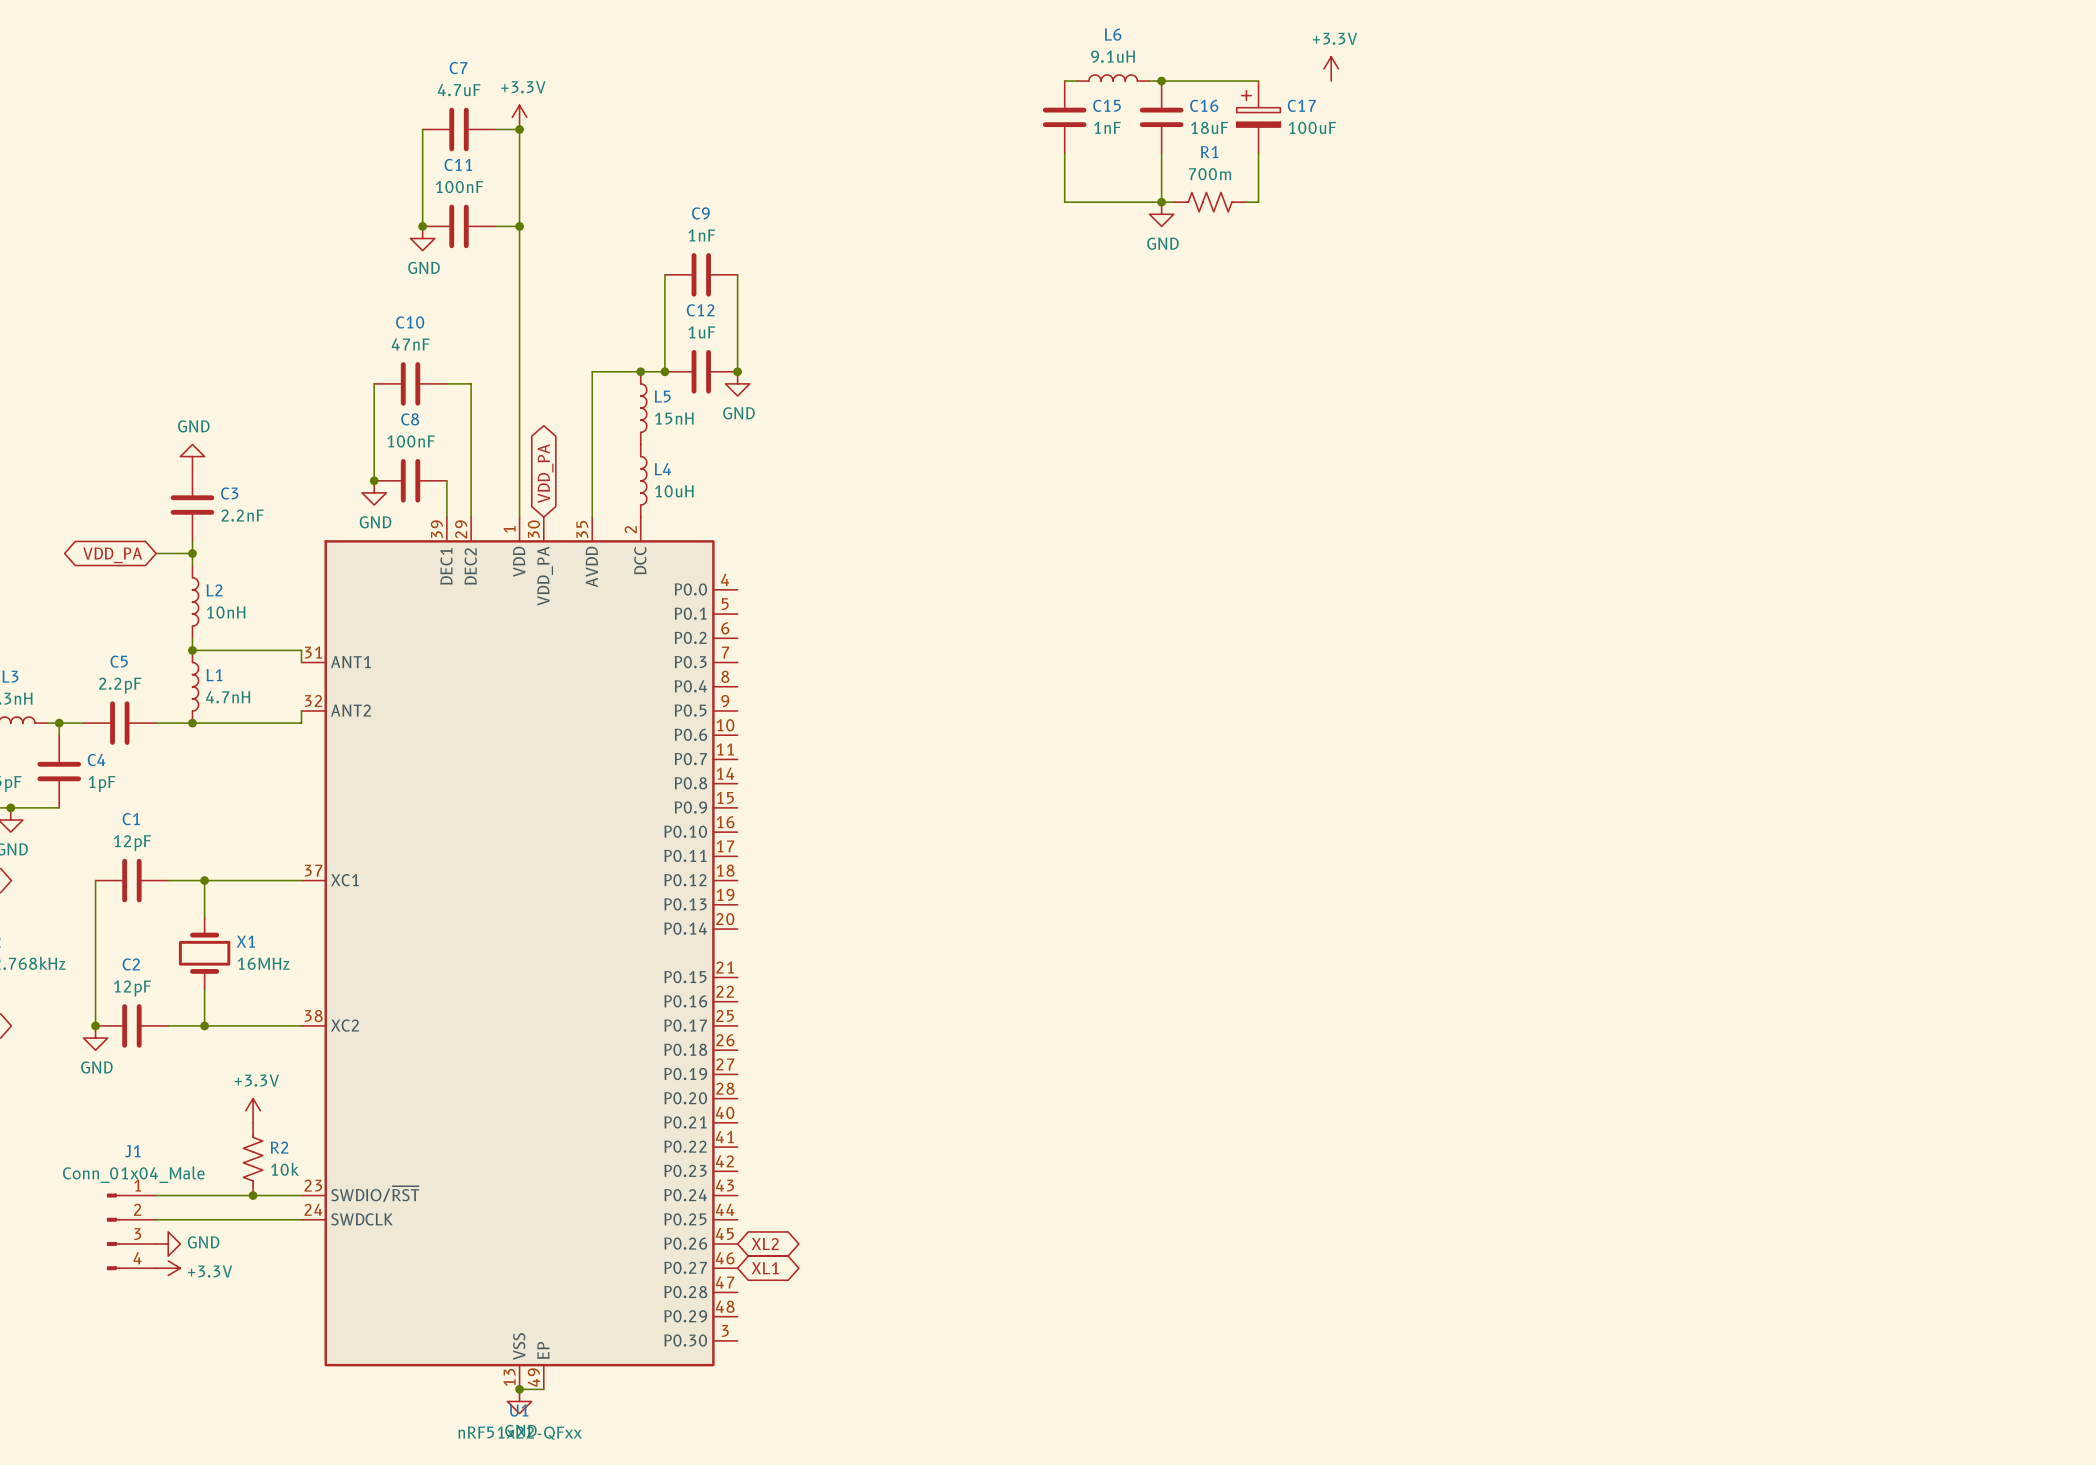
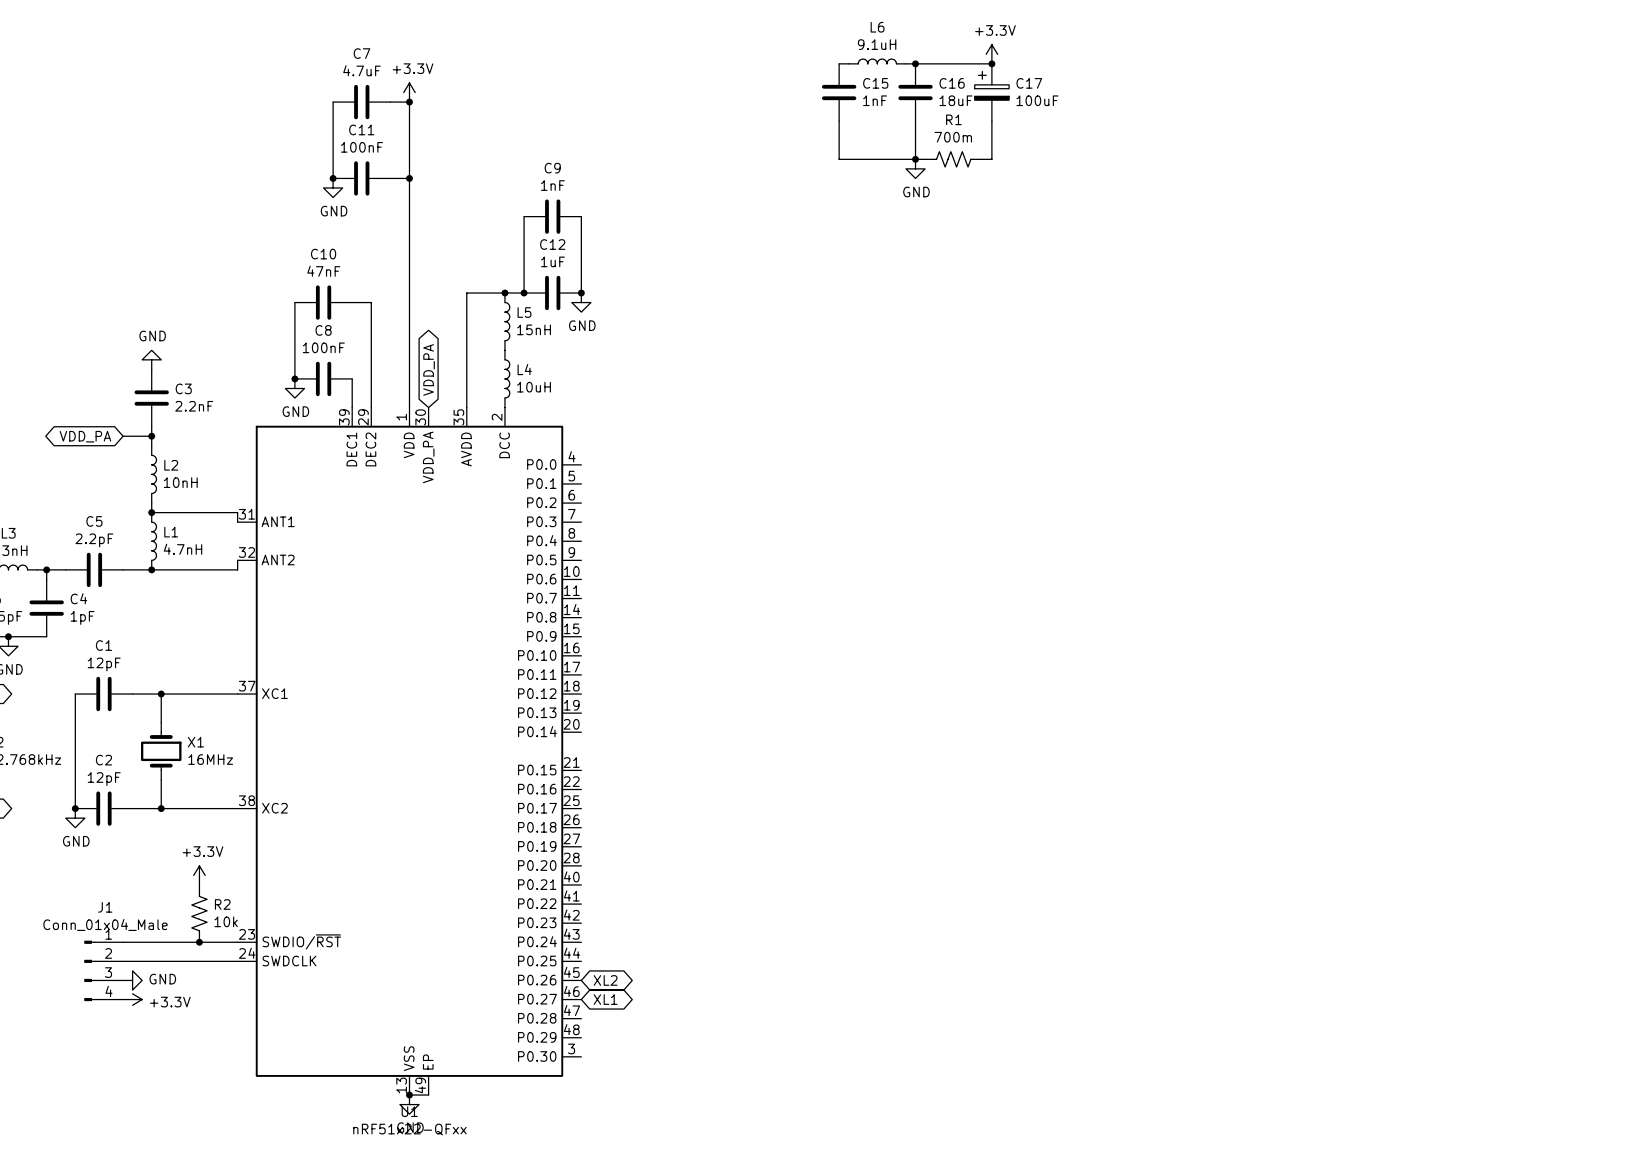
power symbol position: +3.3V (1331, 68) -> +3.3V (991, 54)
junction: none -> (991, 63)

